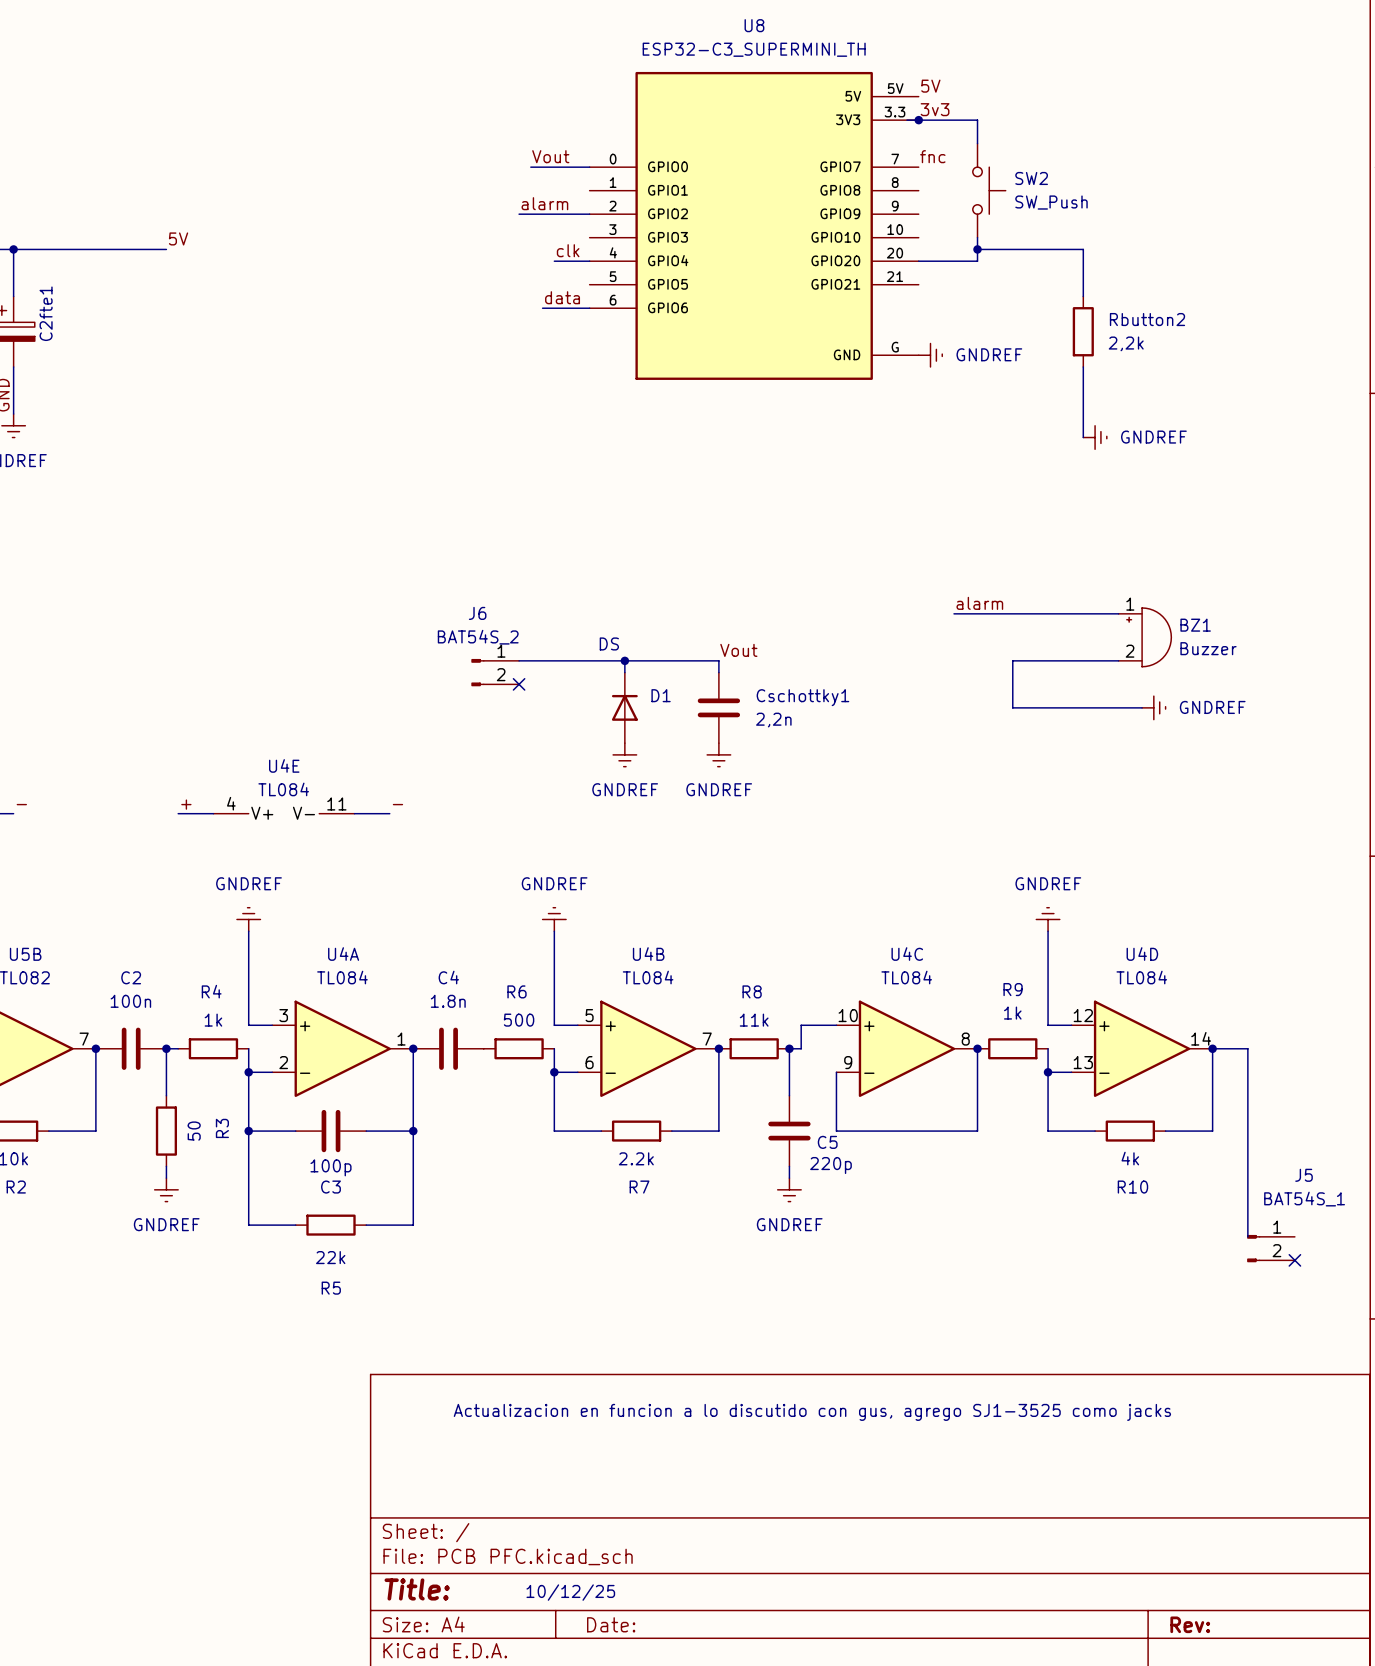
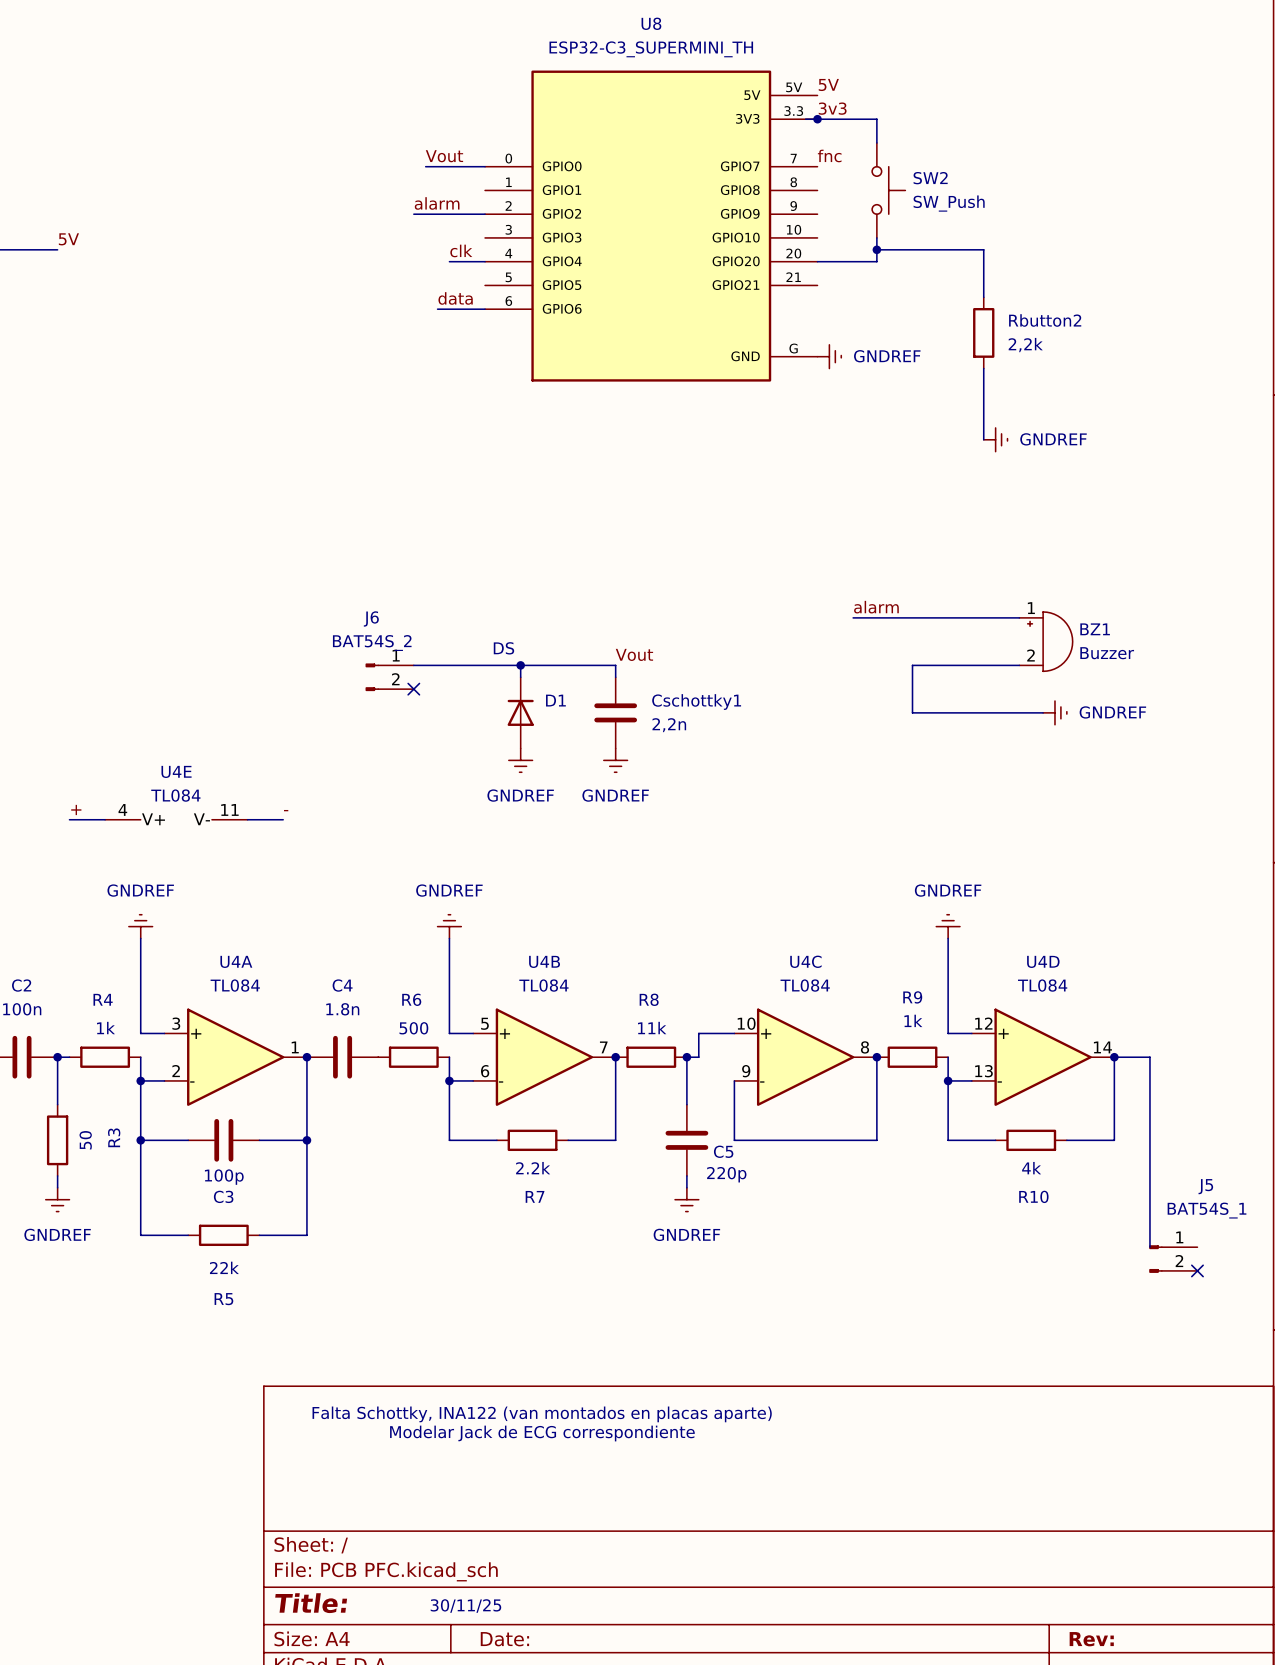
text: none -> Falta Schottky, INA122 (van montados en placas aparte) (542, 1414)
text: Actualizacion en funcion a lo discutido con gus, agrego SJ1-3525 como jacks (812, 1412) -> none
text: none -> Modelar Jack de ECG correspondiente (542, 1433)
text: 10/12/25 (570, 1592) -> 30/11/25 (465, 1606)

